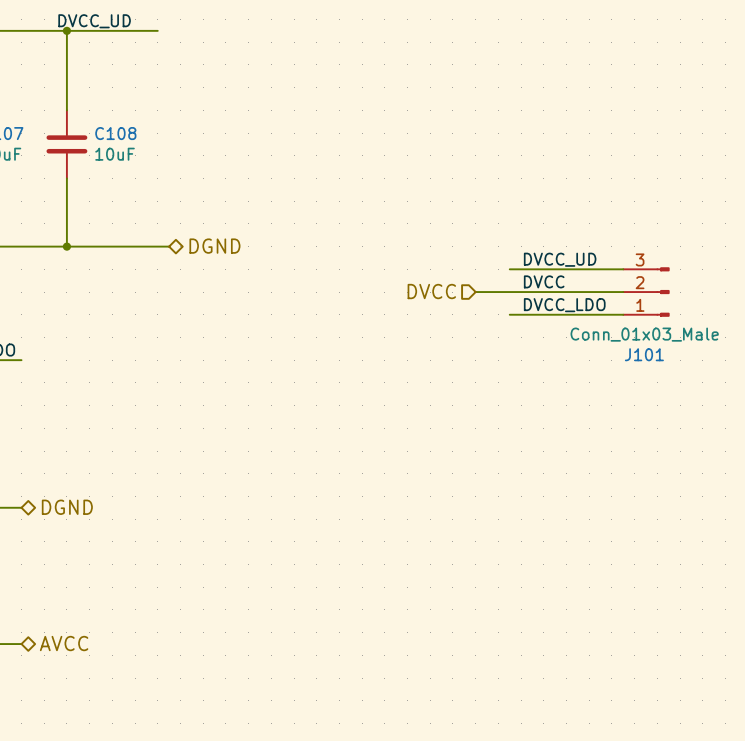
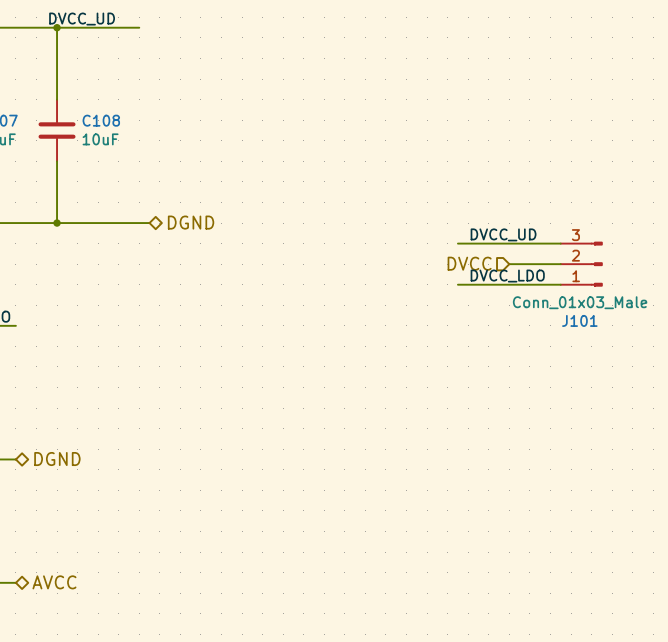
label: DVCC (544, 281) -> none
hierarchical label position: DVCC (431, 291) -> DVCC (469, 263)
wire: (475, 292) (566, 292) -> none

